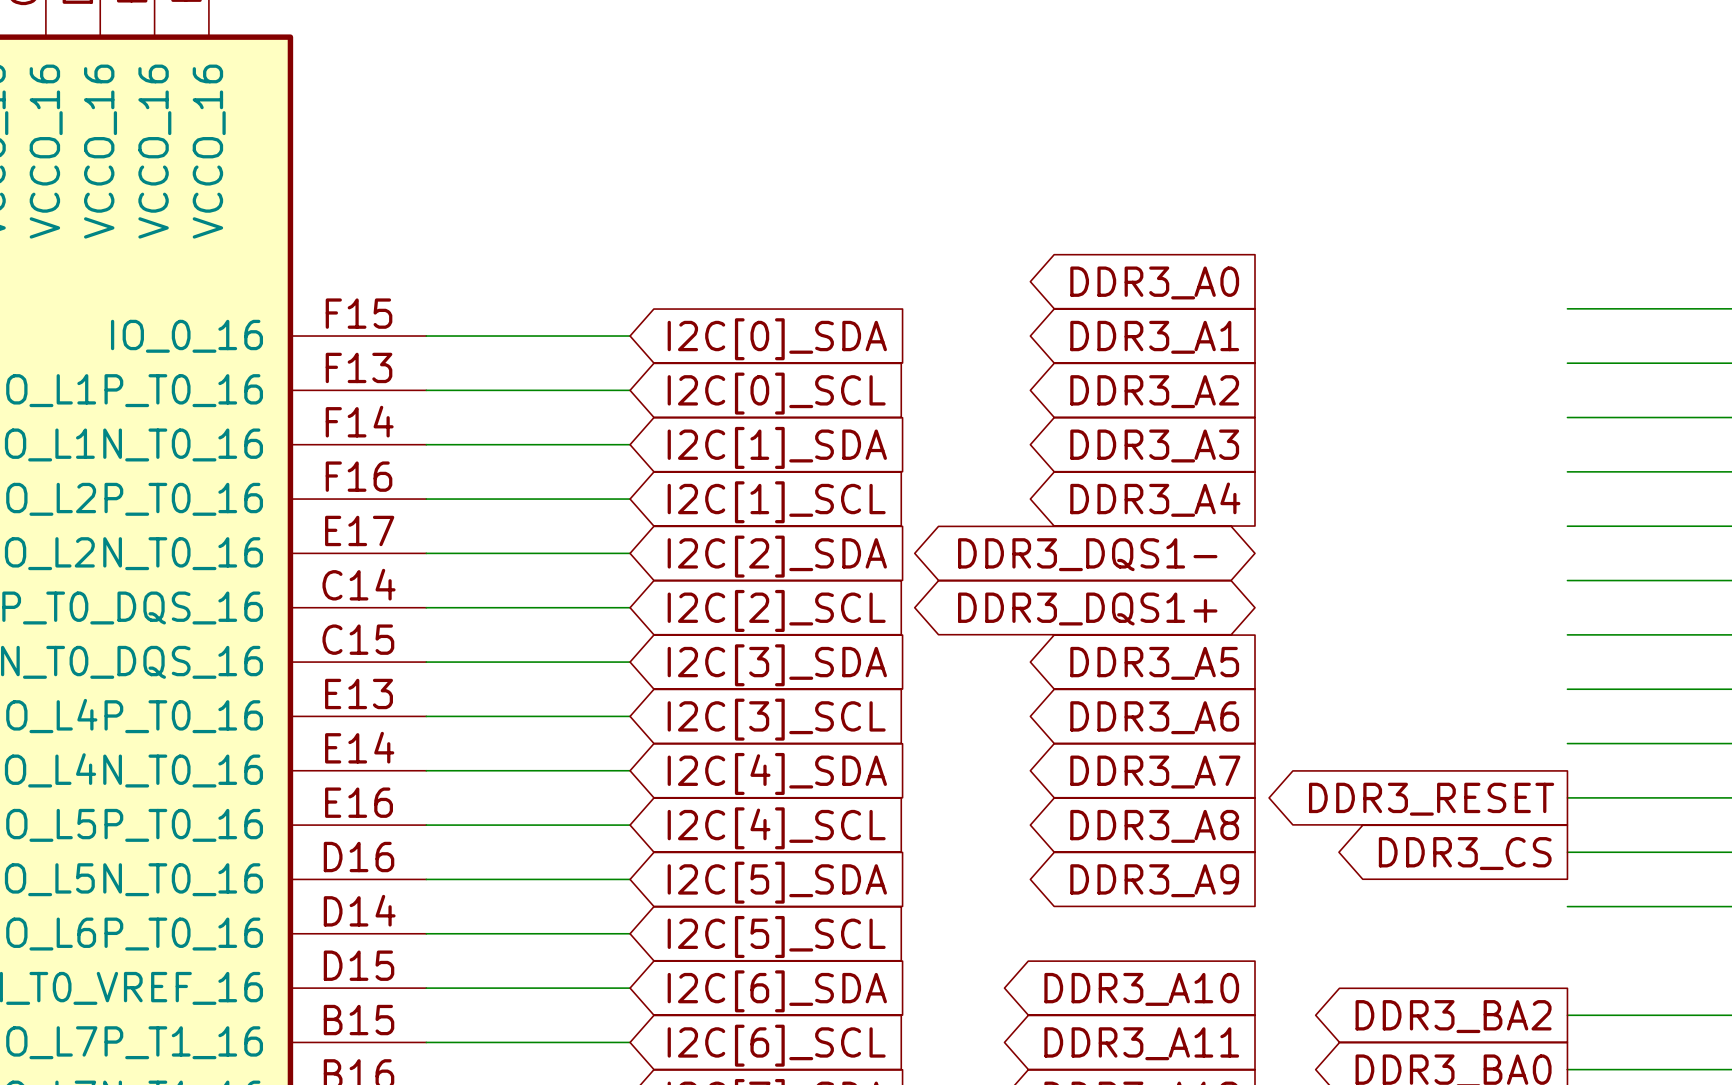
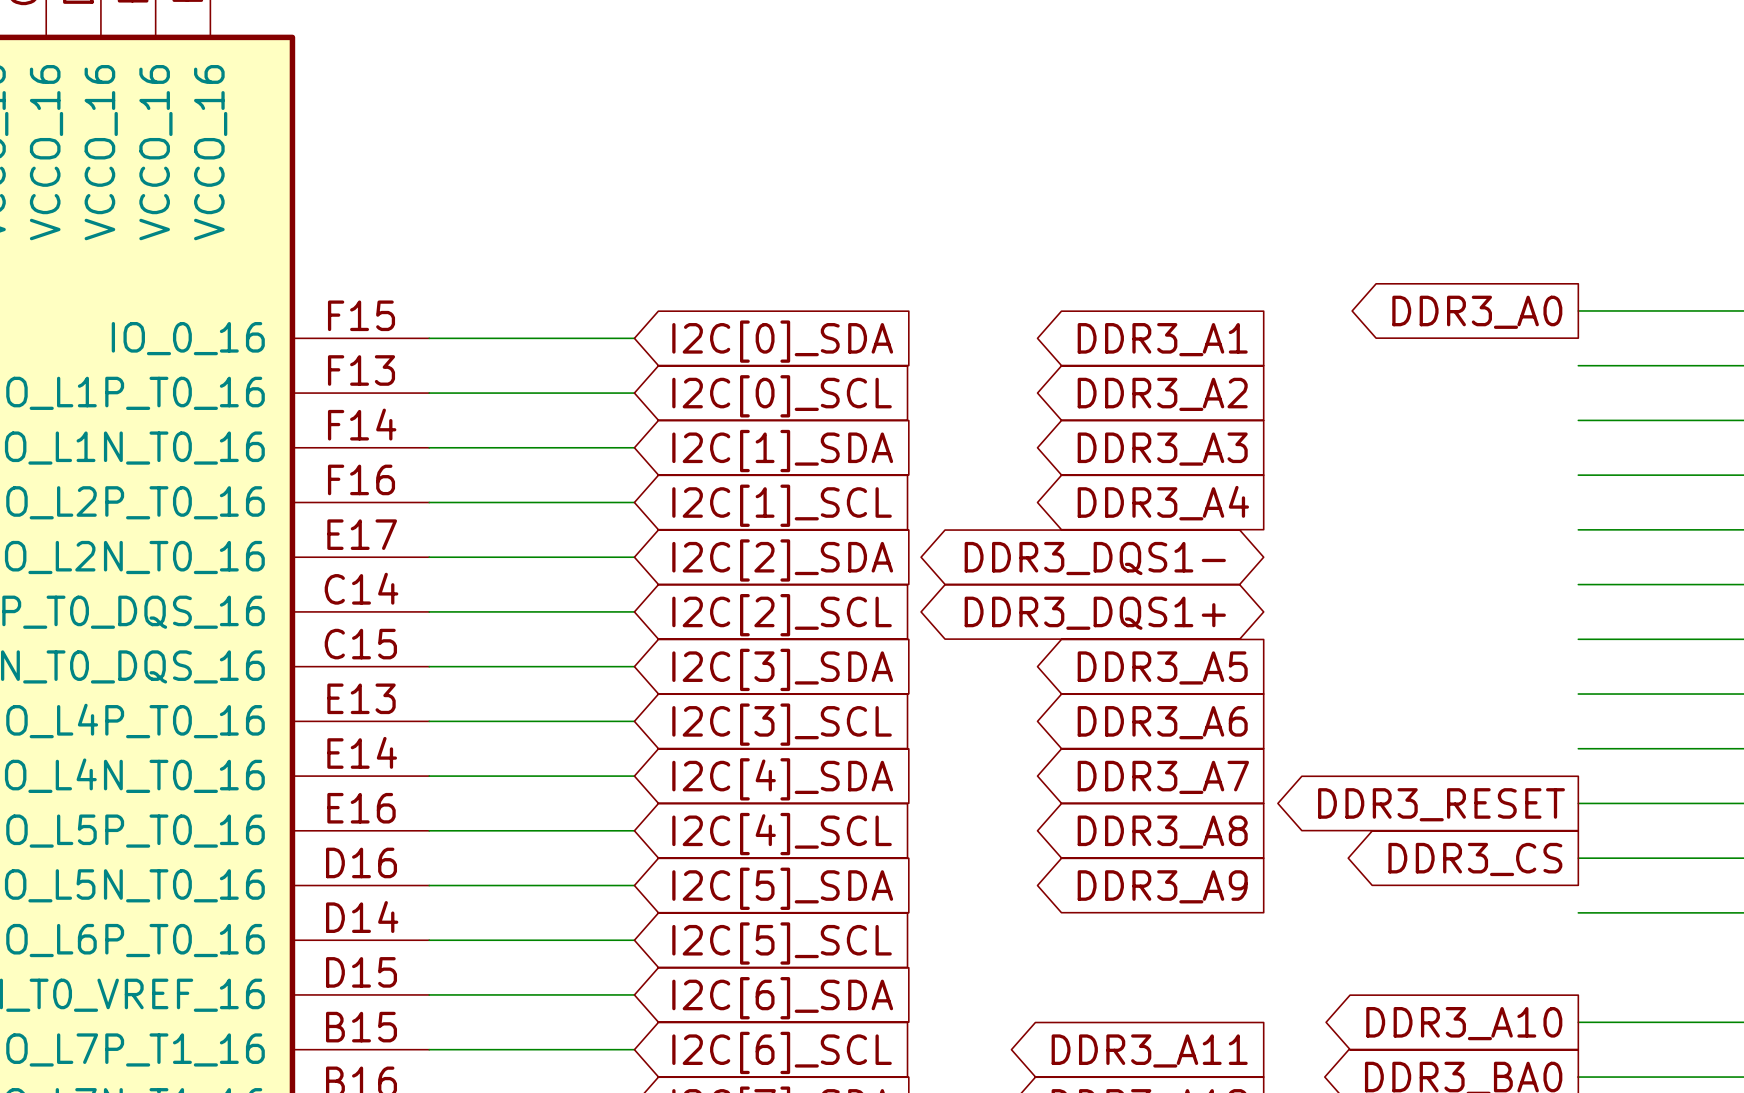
global label position: DDR3_A0 (1154, 282) -> DDR3_A0 (1477, 312)
global label: DDR3_A10 (1141, 989) -> none
global label: DDR3_BA2 (1453, 1016) -> DDR3_A10 (1464, 1023)

